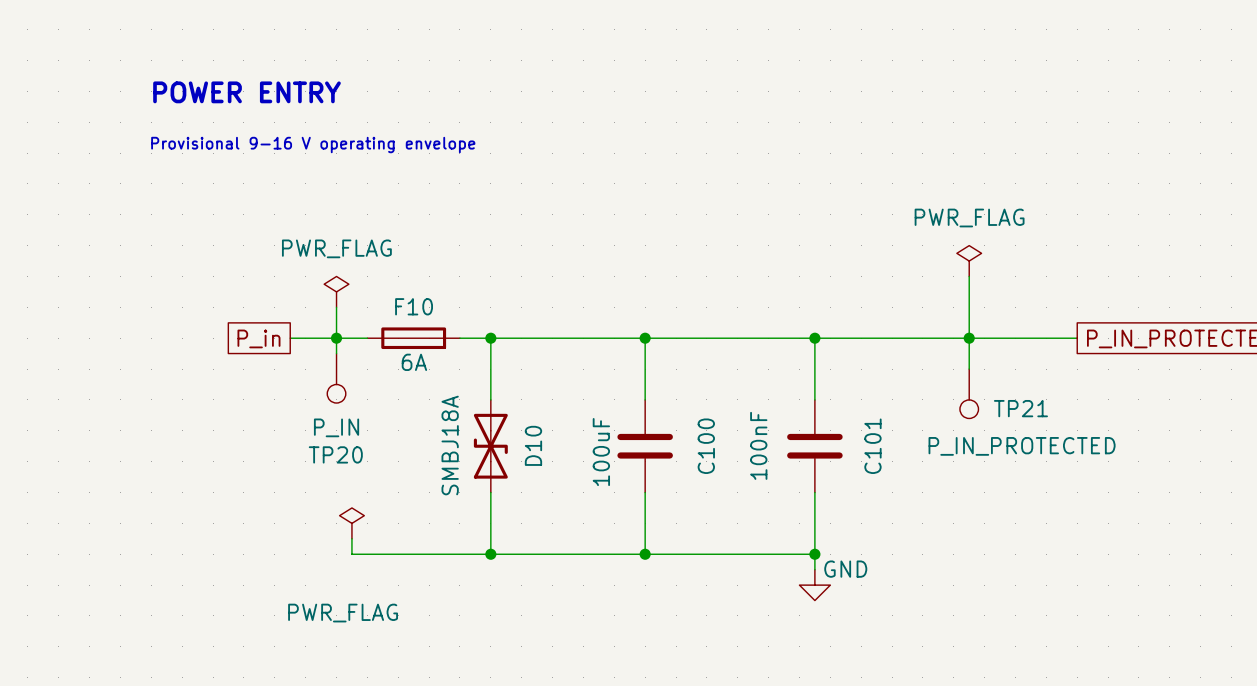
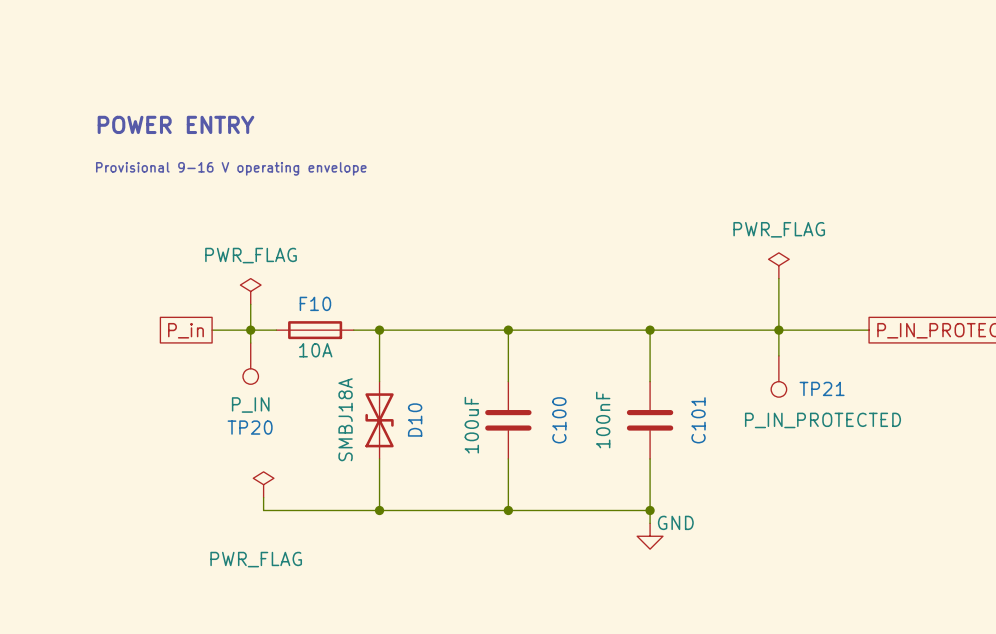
F10 value: 6A (414, 362) -> 10A (315, 350)

